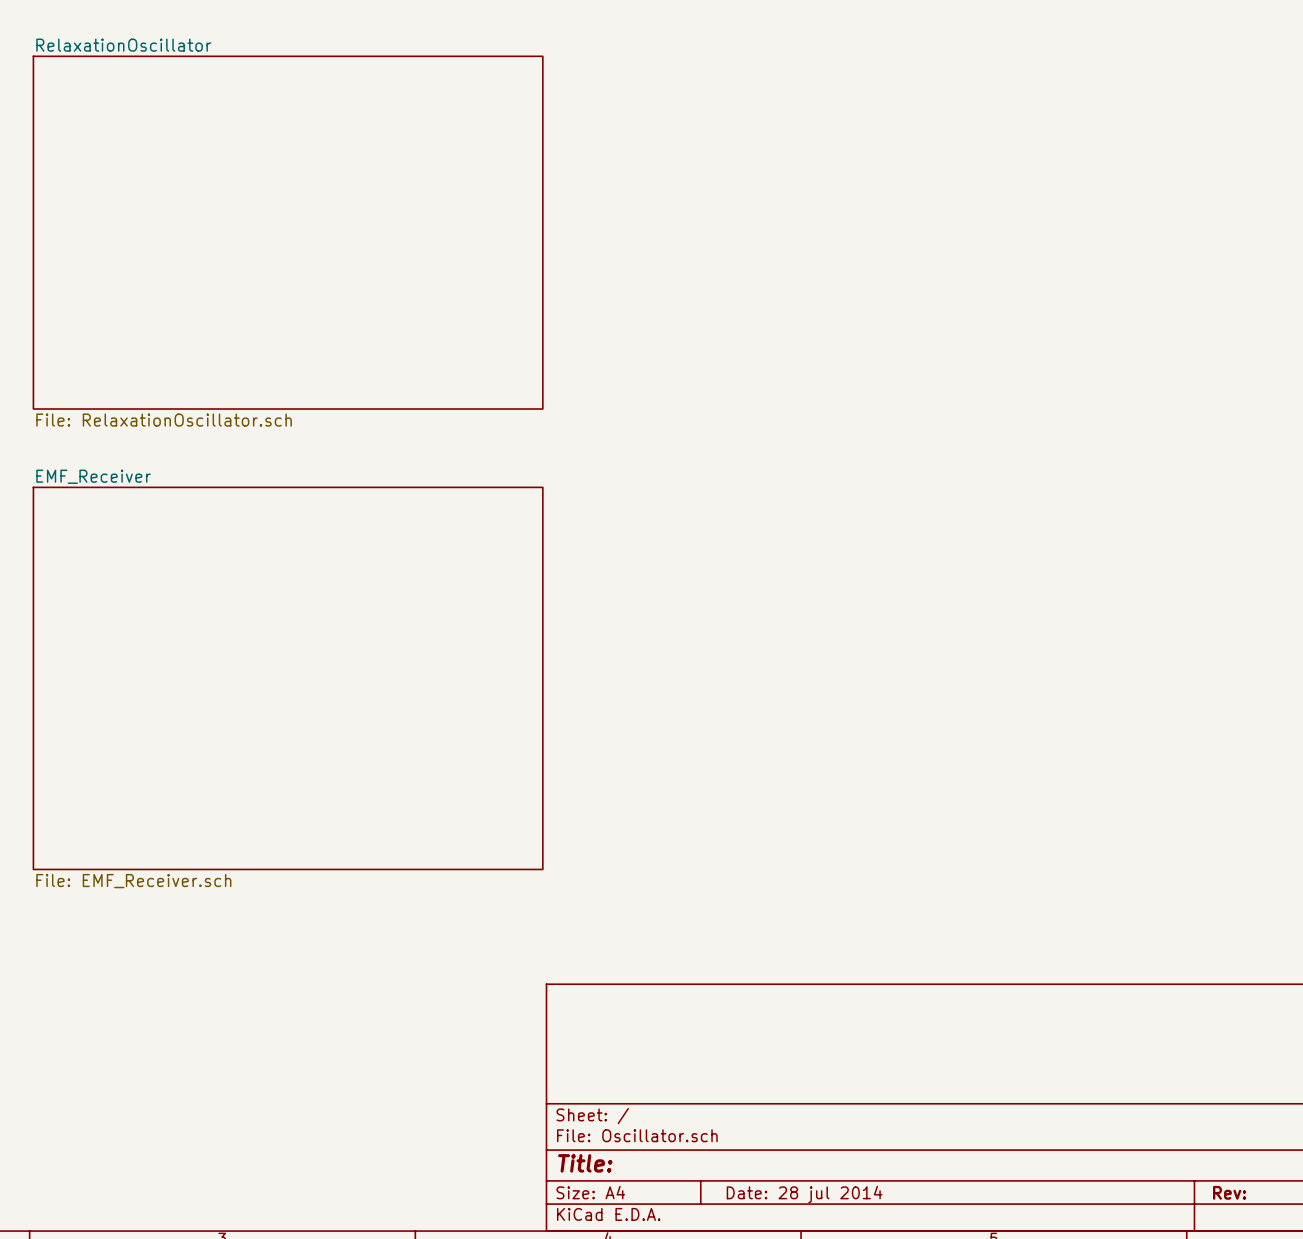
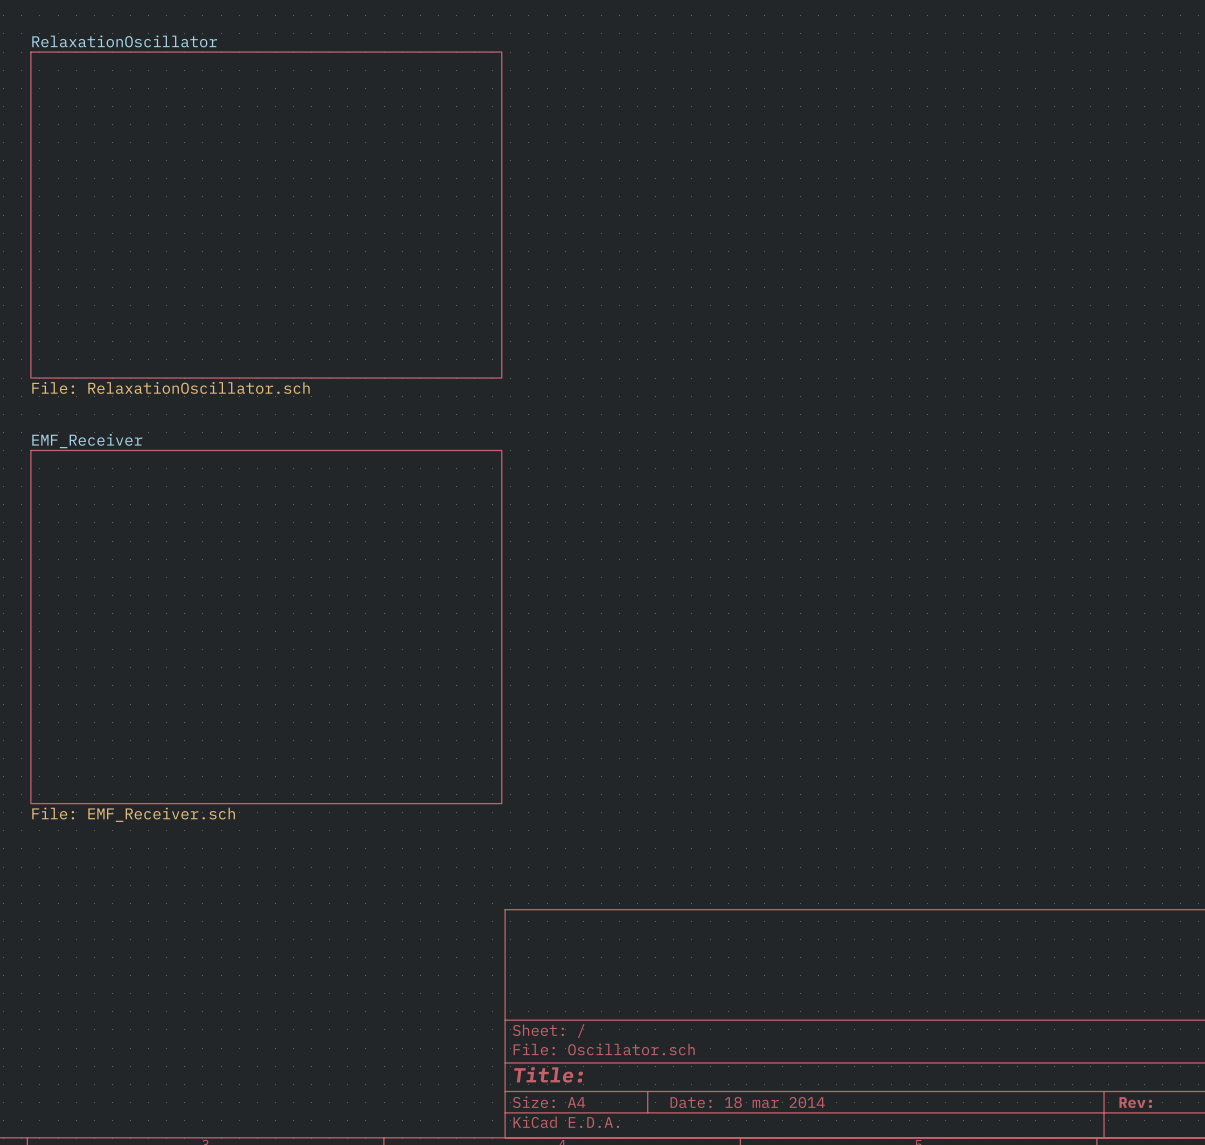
title block: Date: 28 jul 2014 (804, 1194) -> Date: 18 mar 2014 (747, 1102)

